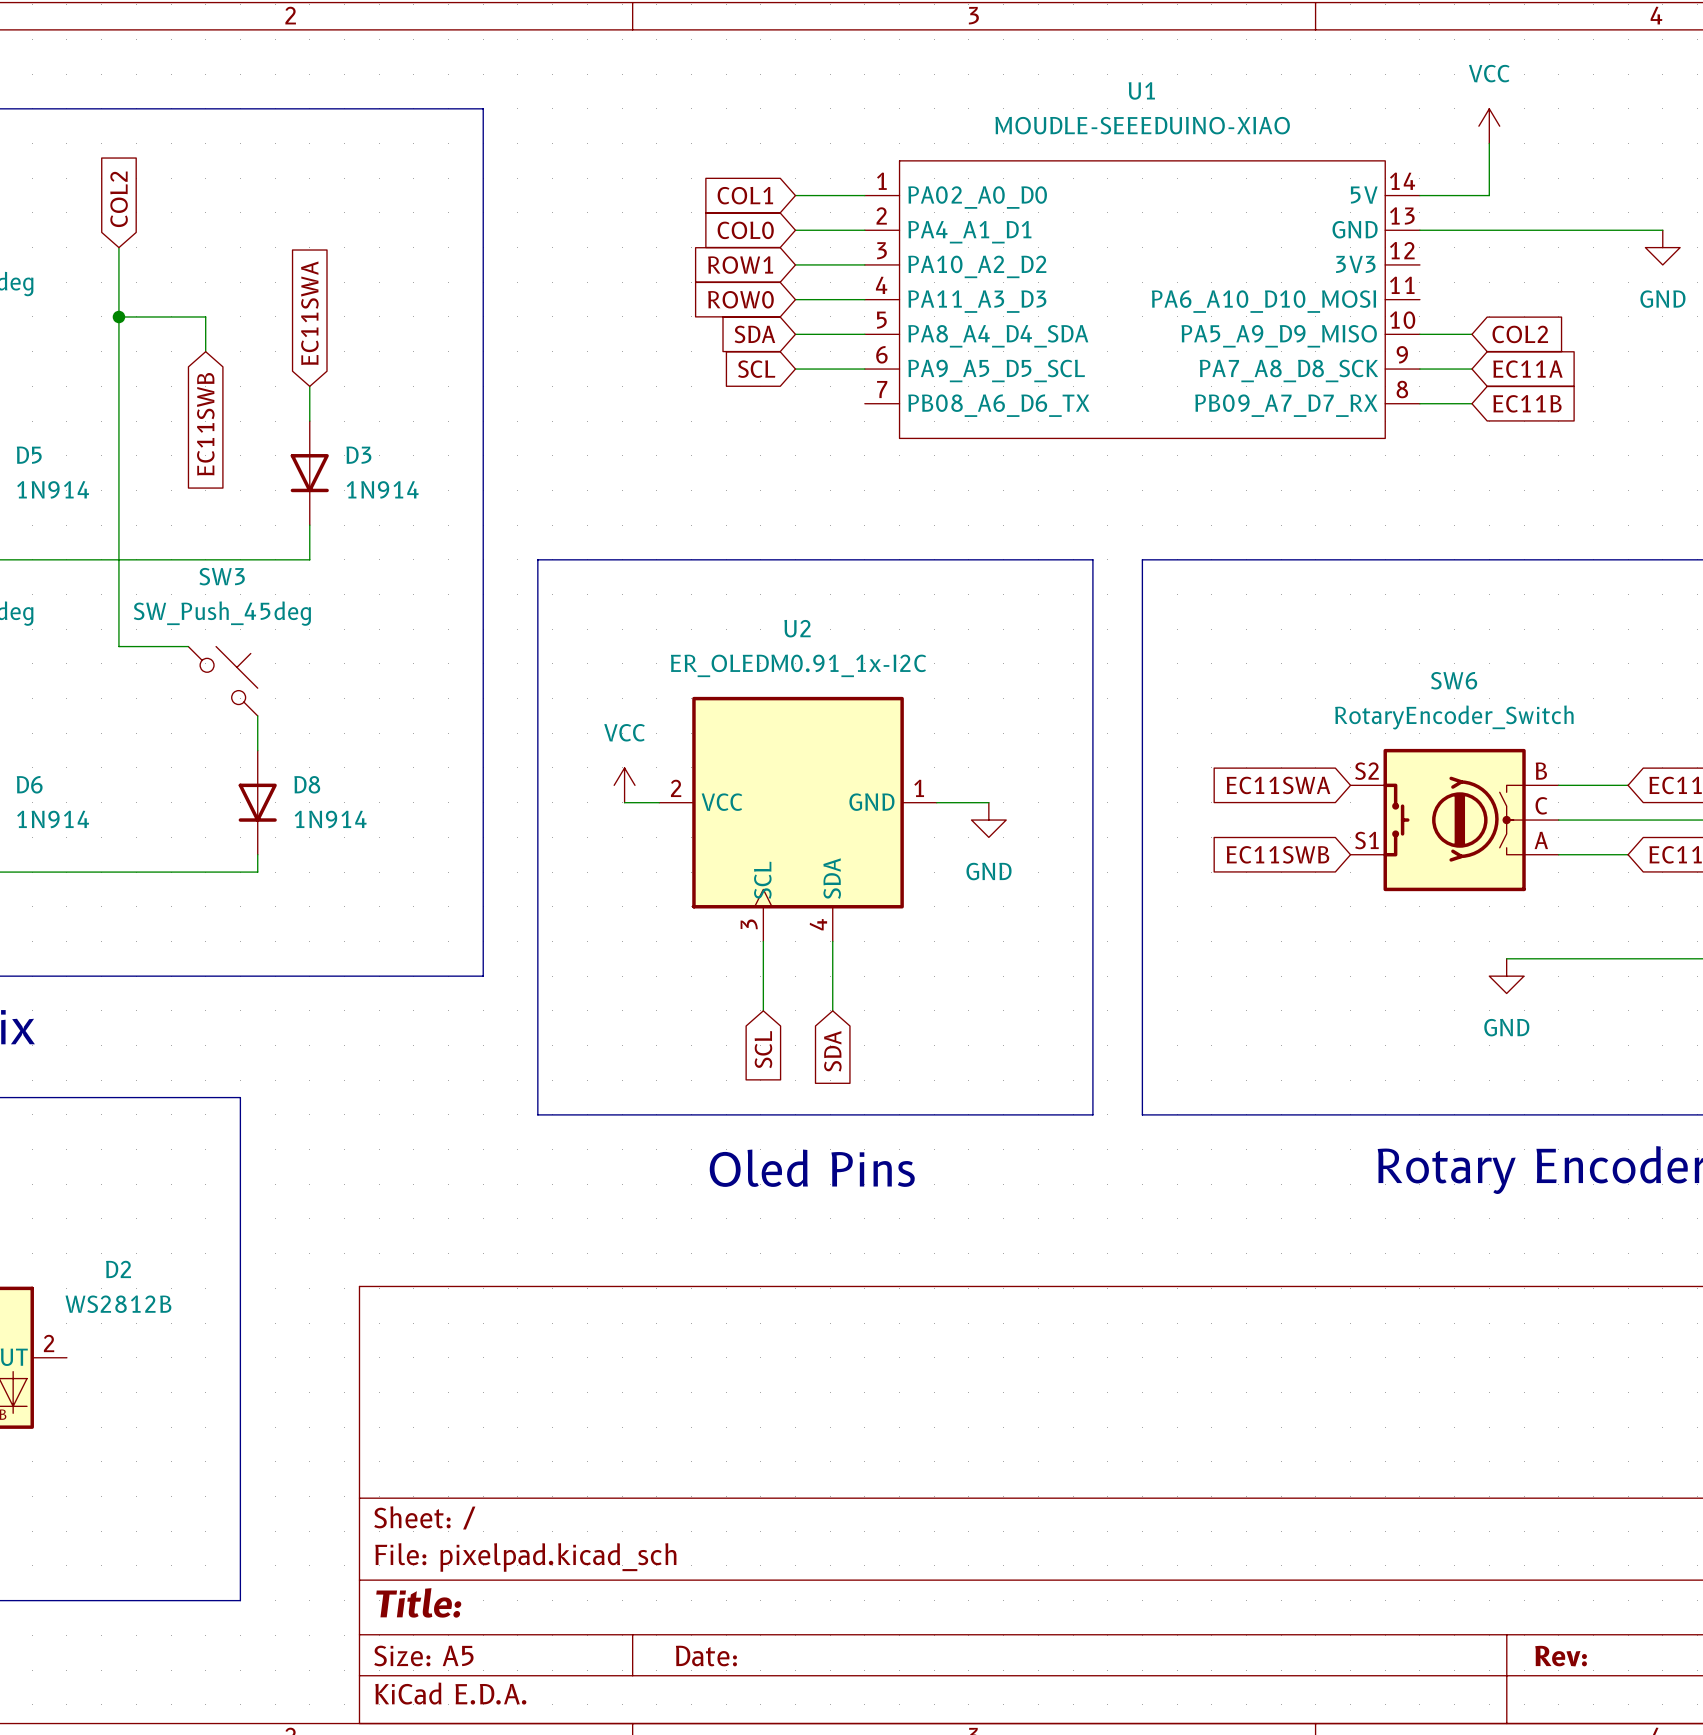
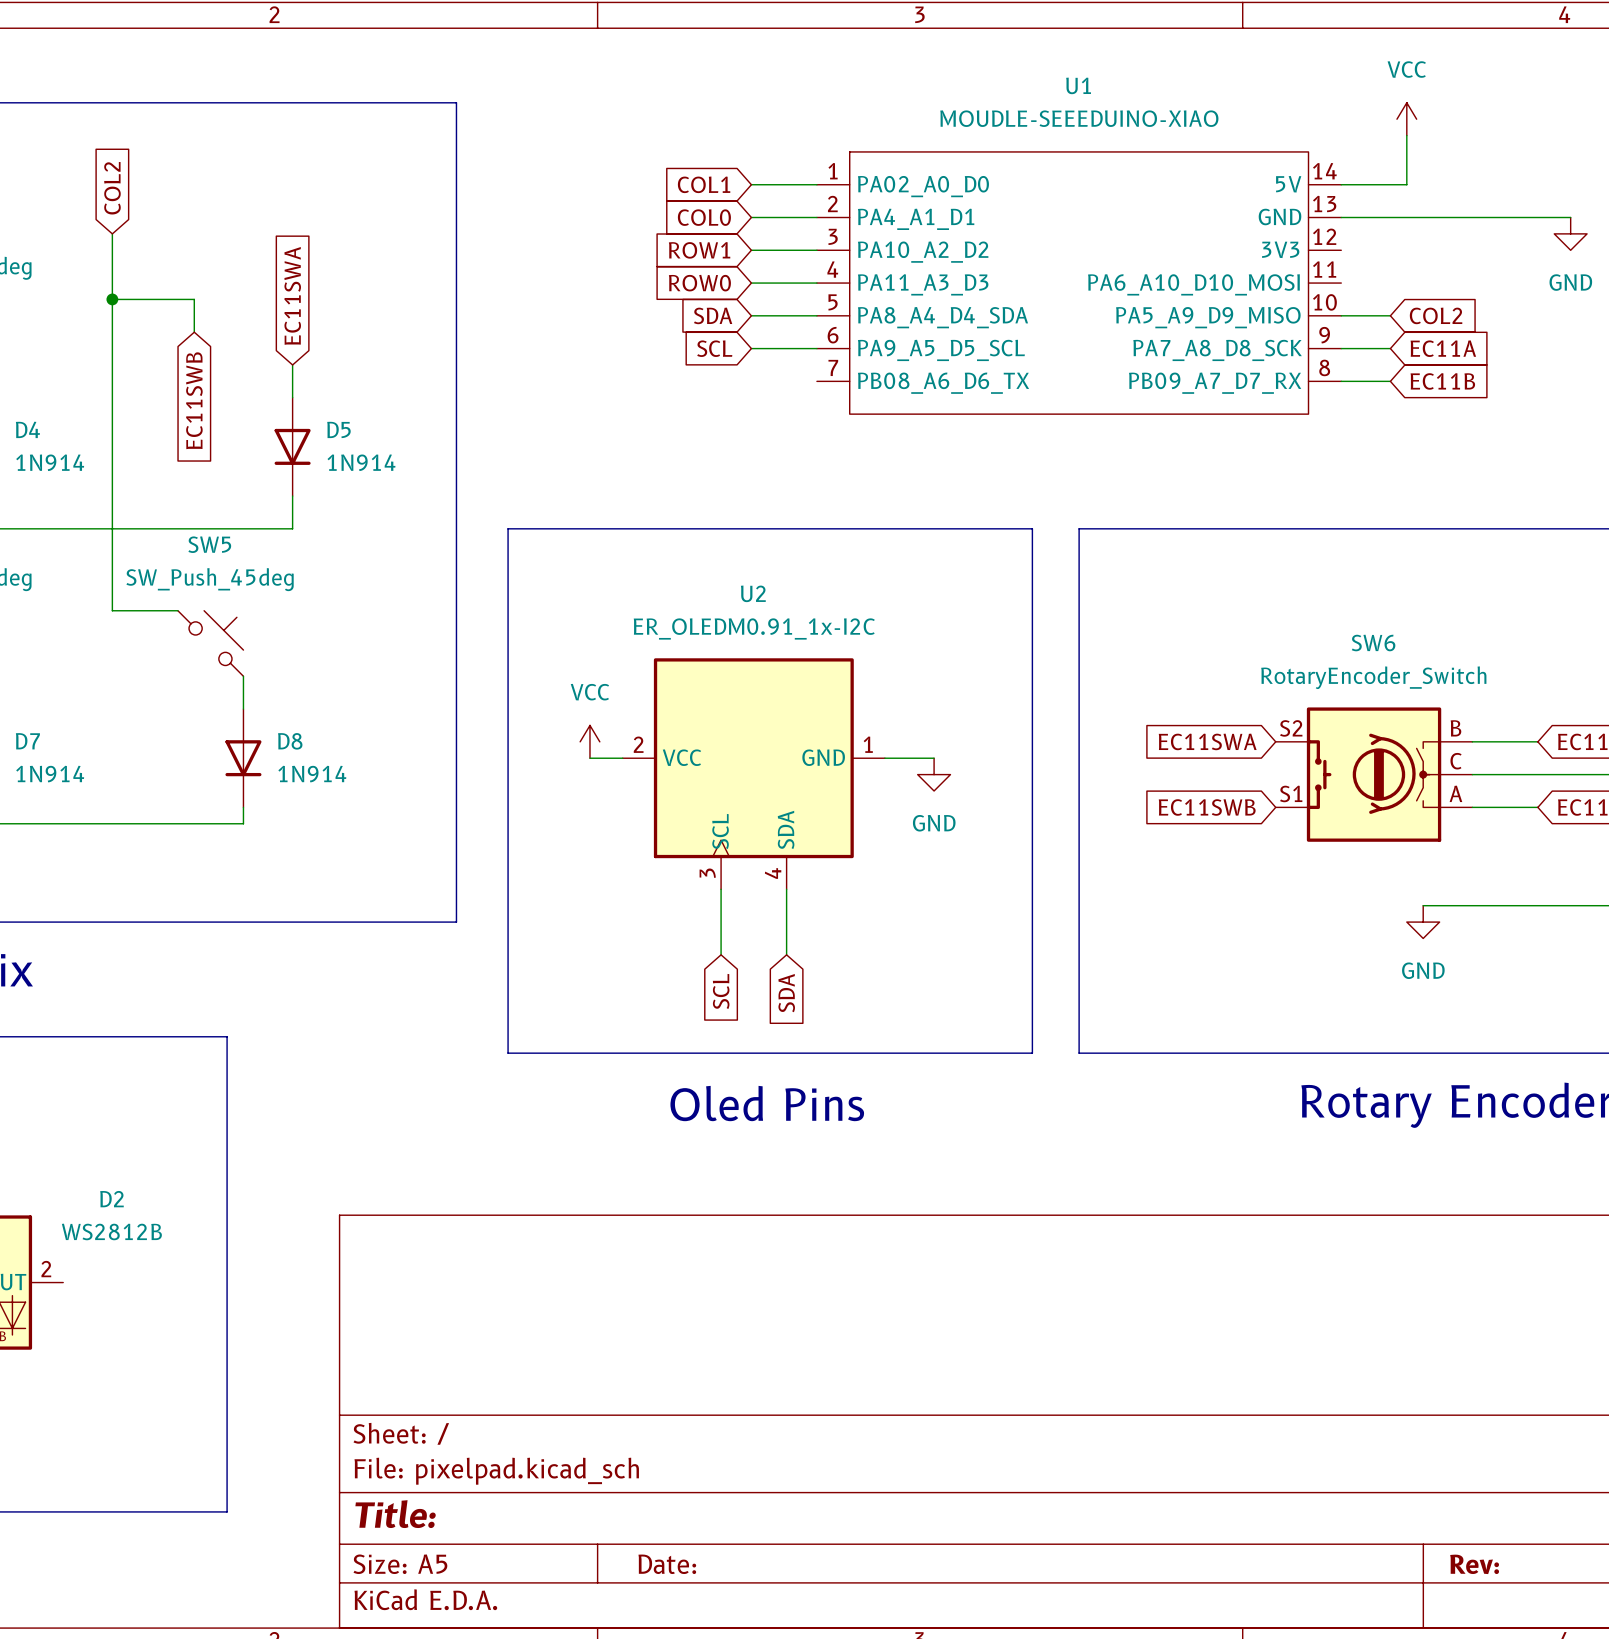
D5 name: D5 (29, 455) -> D4 (27, 429)
D3 name: D3 (358, 455) -> D5 (338, 429)
SW3 name: SW3 (222, 576) -> SW5 (209, 544)
D6 name: D6 (29, 784) -> D7 (27, 741)

